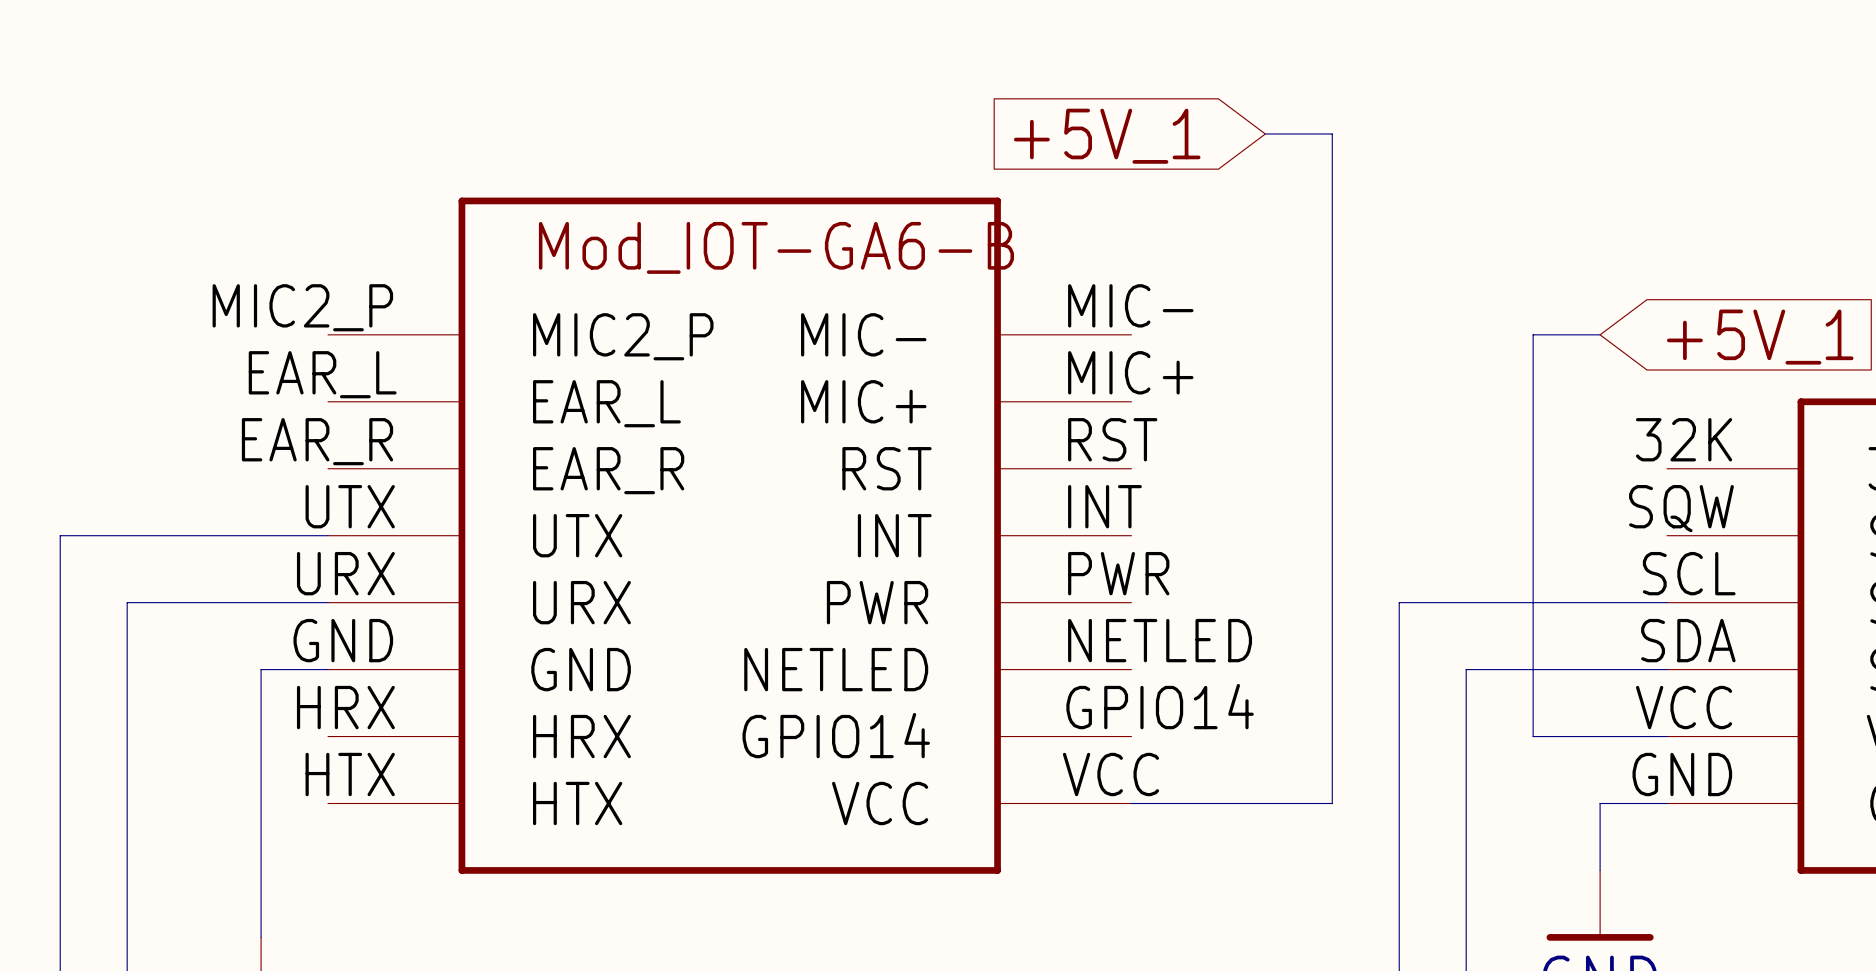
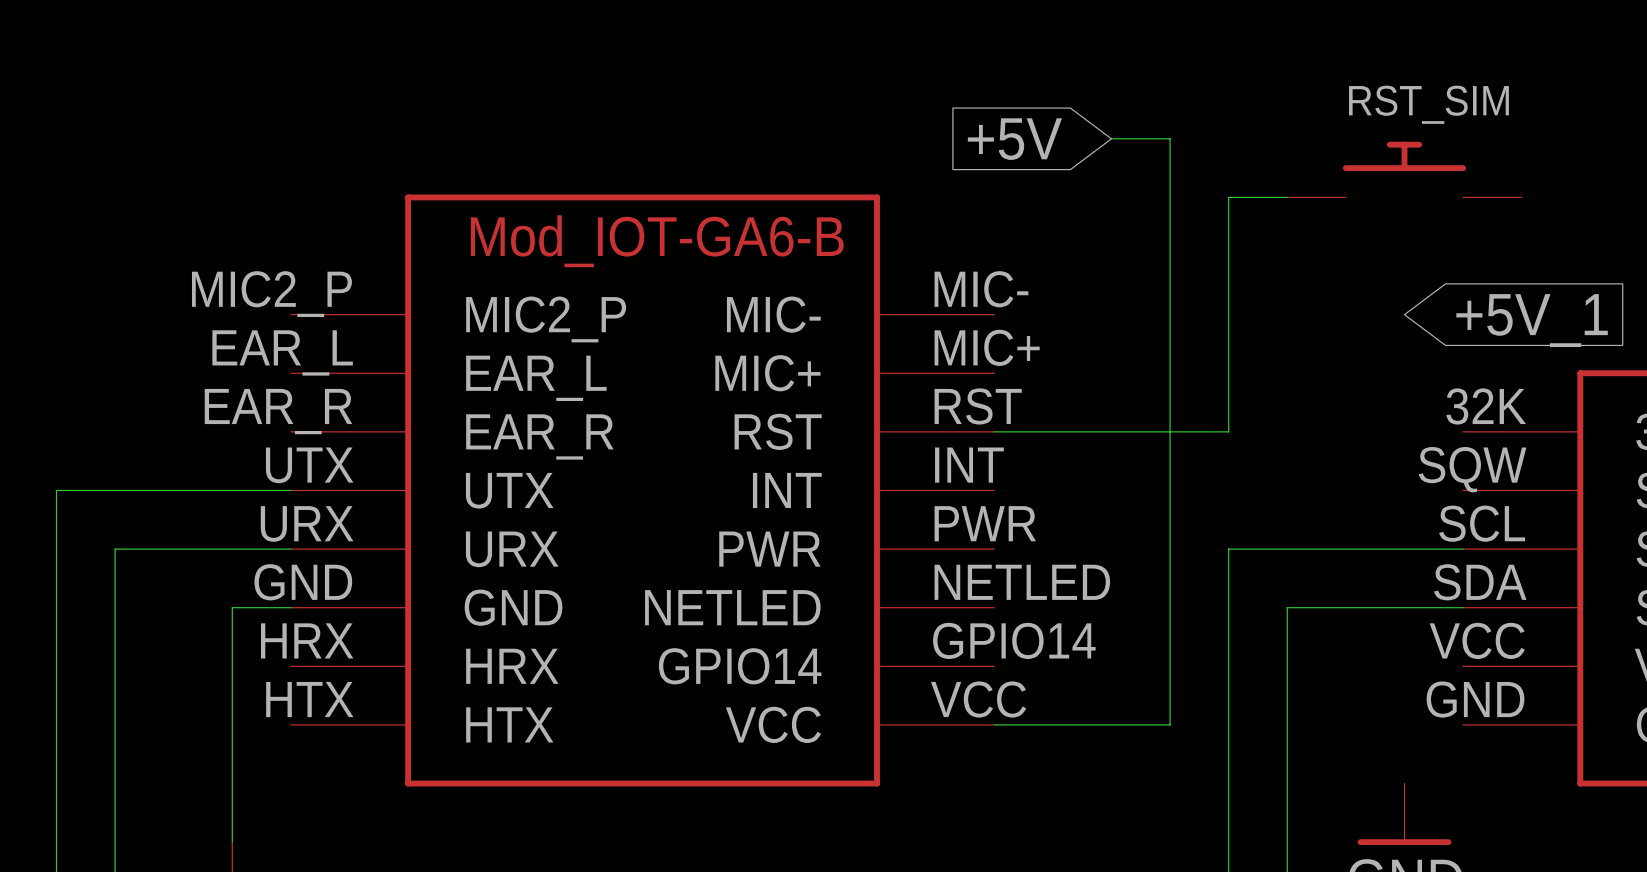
global label: +5V_1 (1107, 136) -> +5V (1014, 139)
RST_SIM: none -> (1404, 169)
wire: none -> (1287, 197) (1228, 197) (1228, 431) (994, 431)
wire: (1600, 334) (1533, 334) (1533, 736) (1667, 736) -> none
wire: (1667, 803) (1600, 803) (1600, 870) -> none

